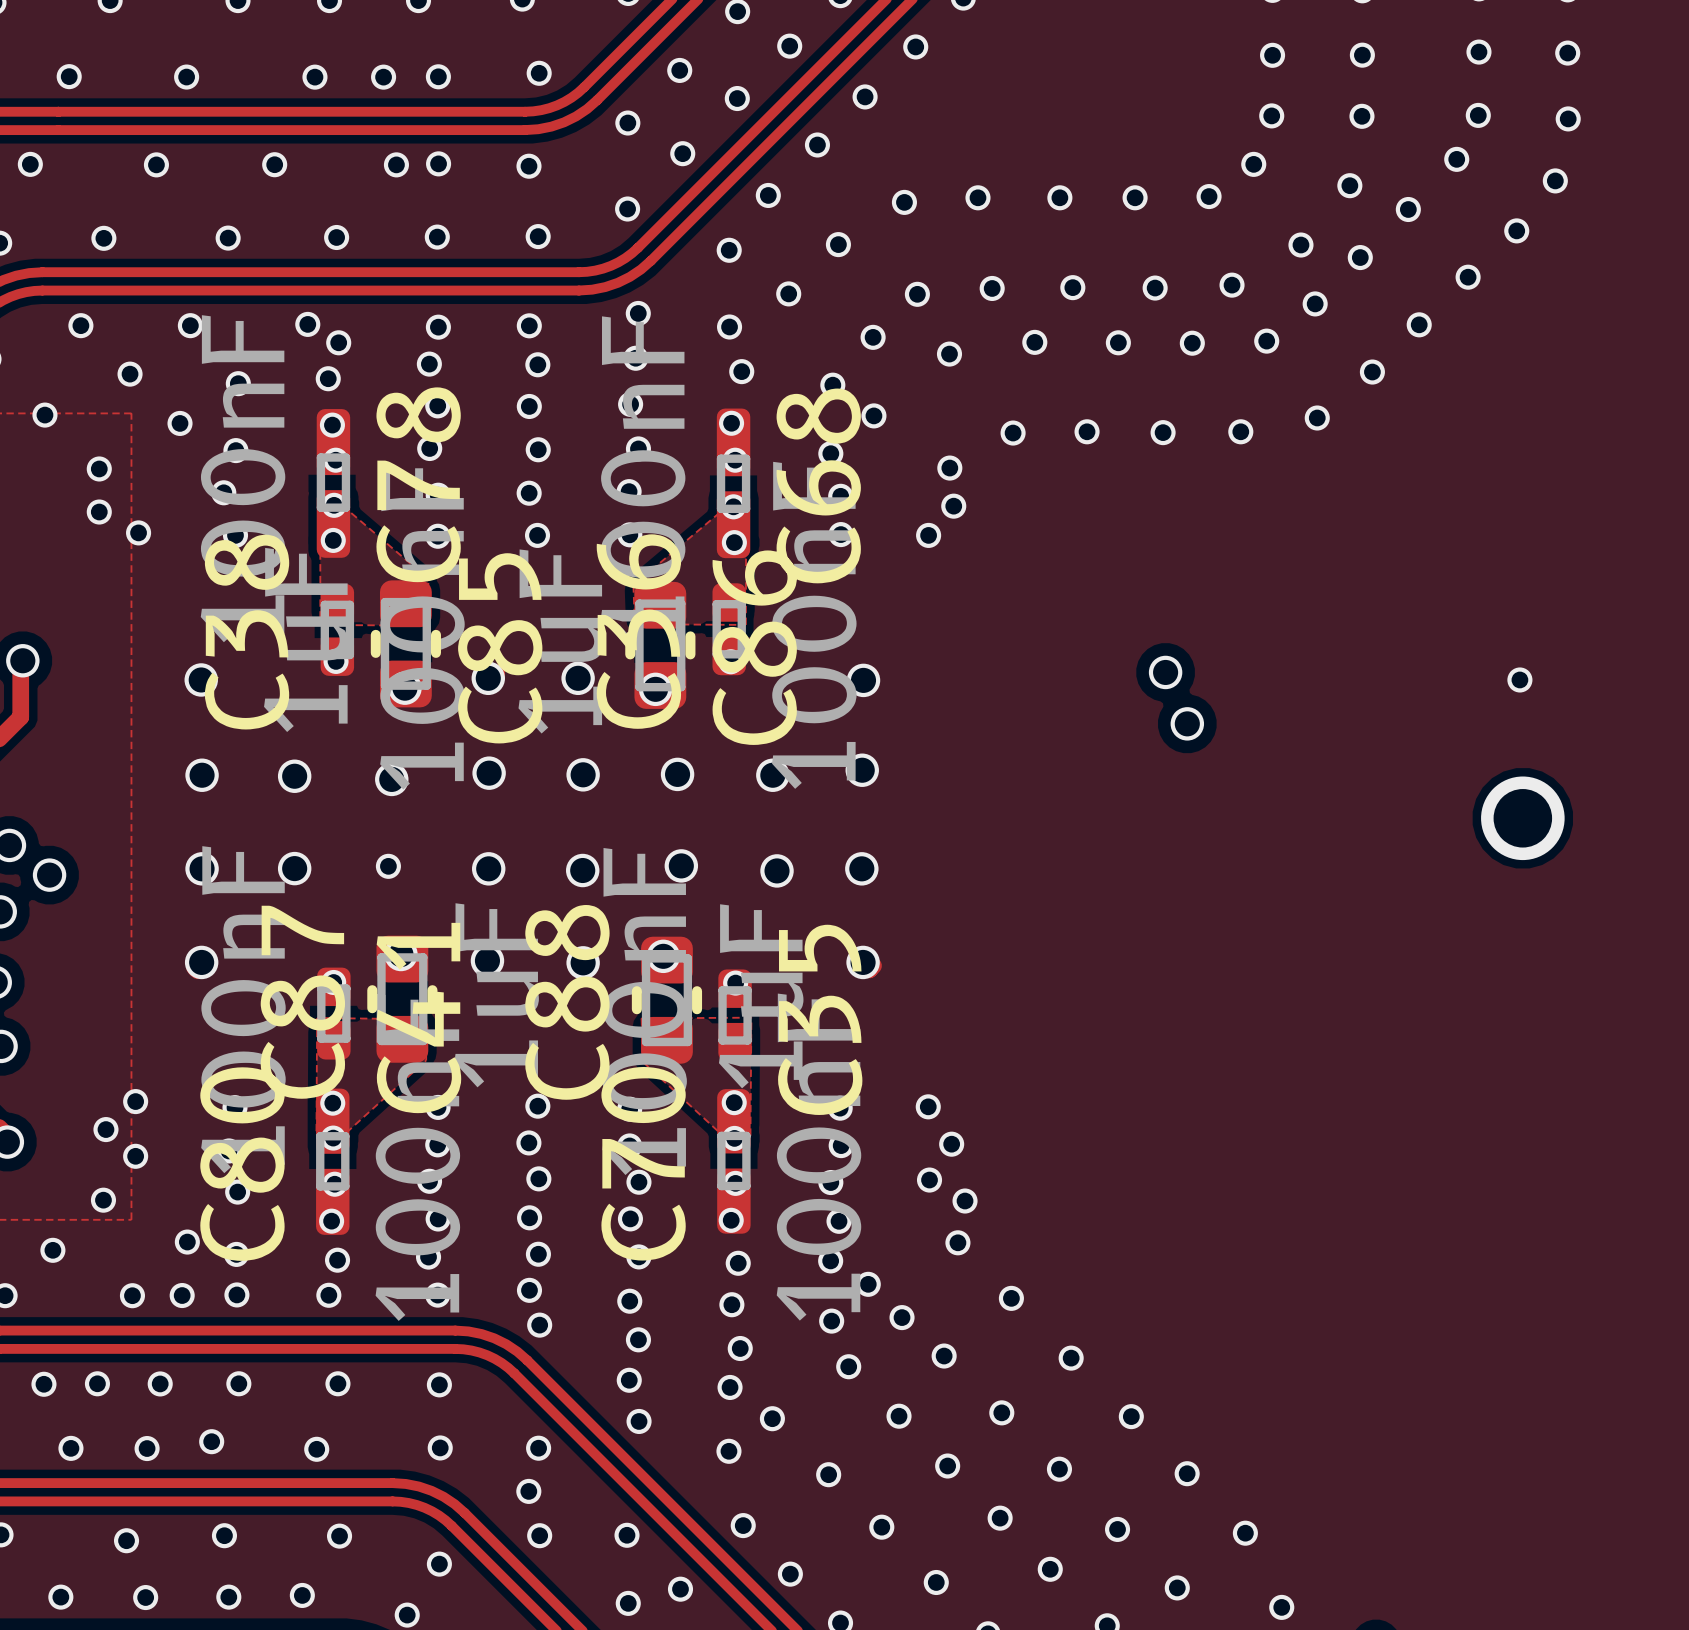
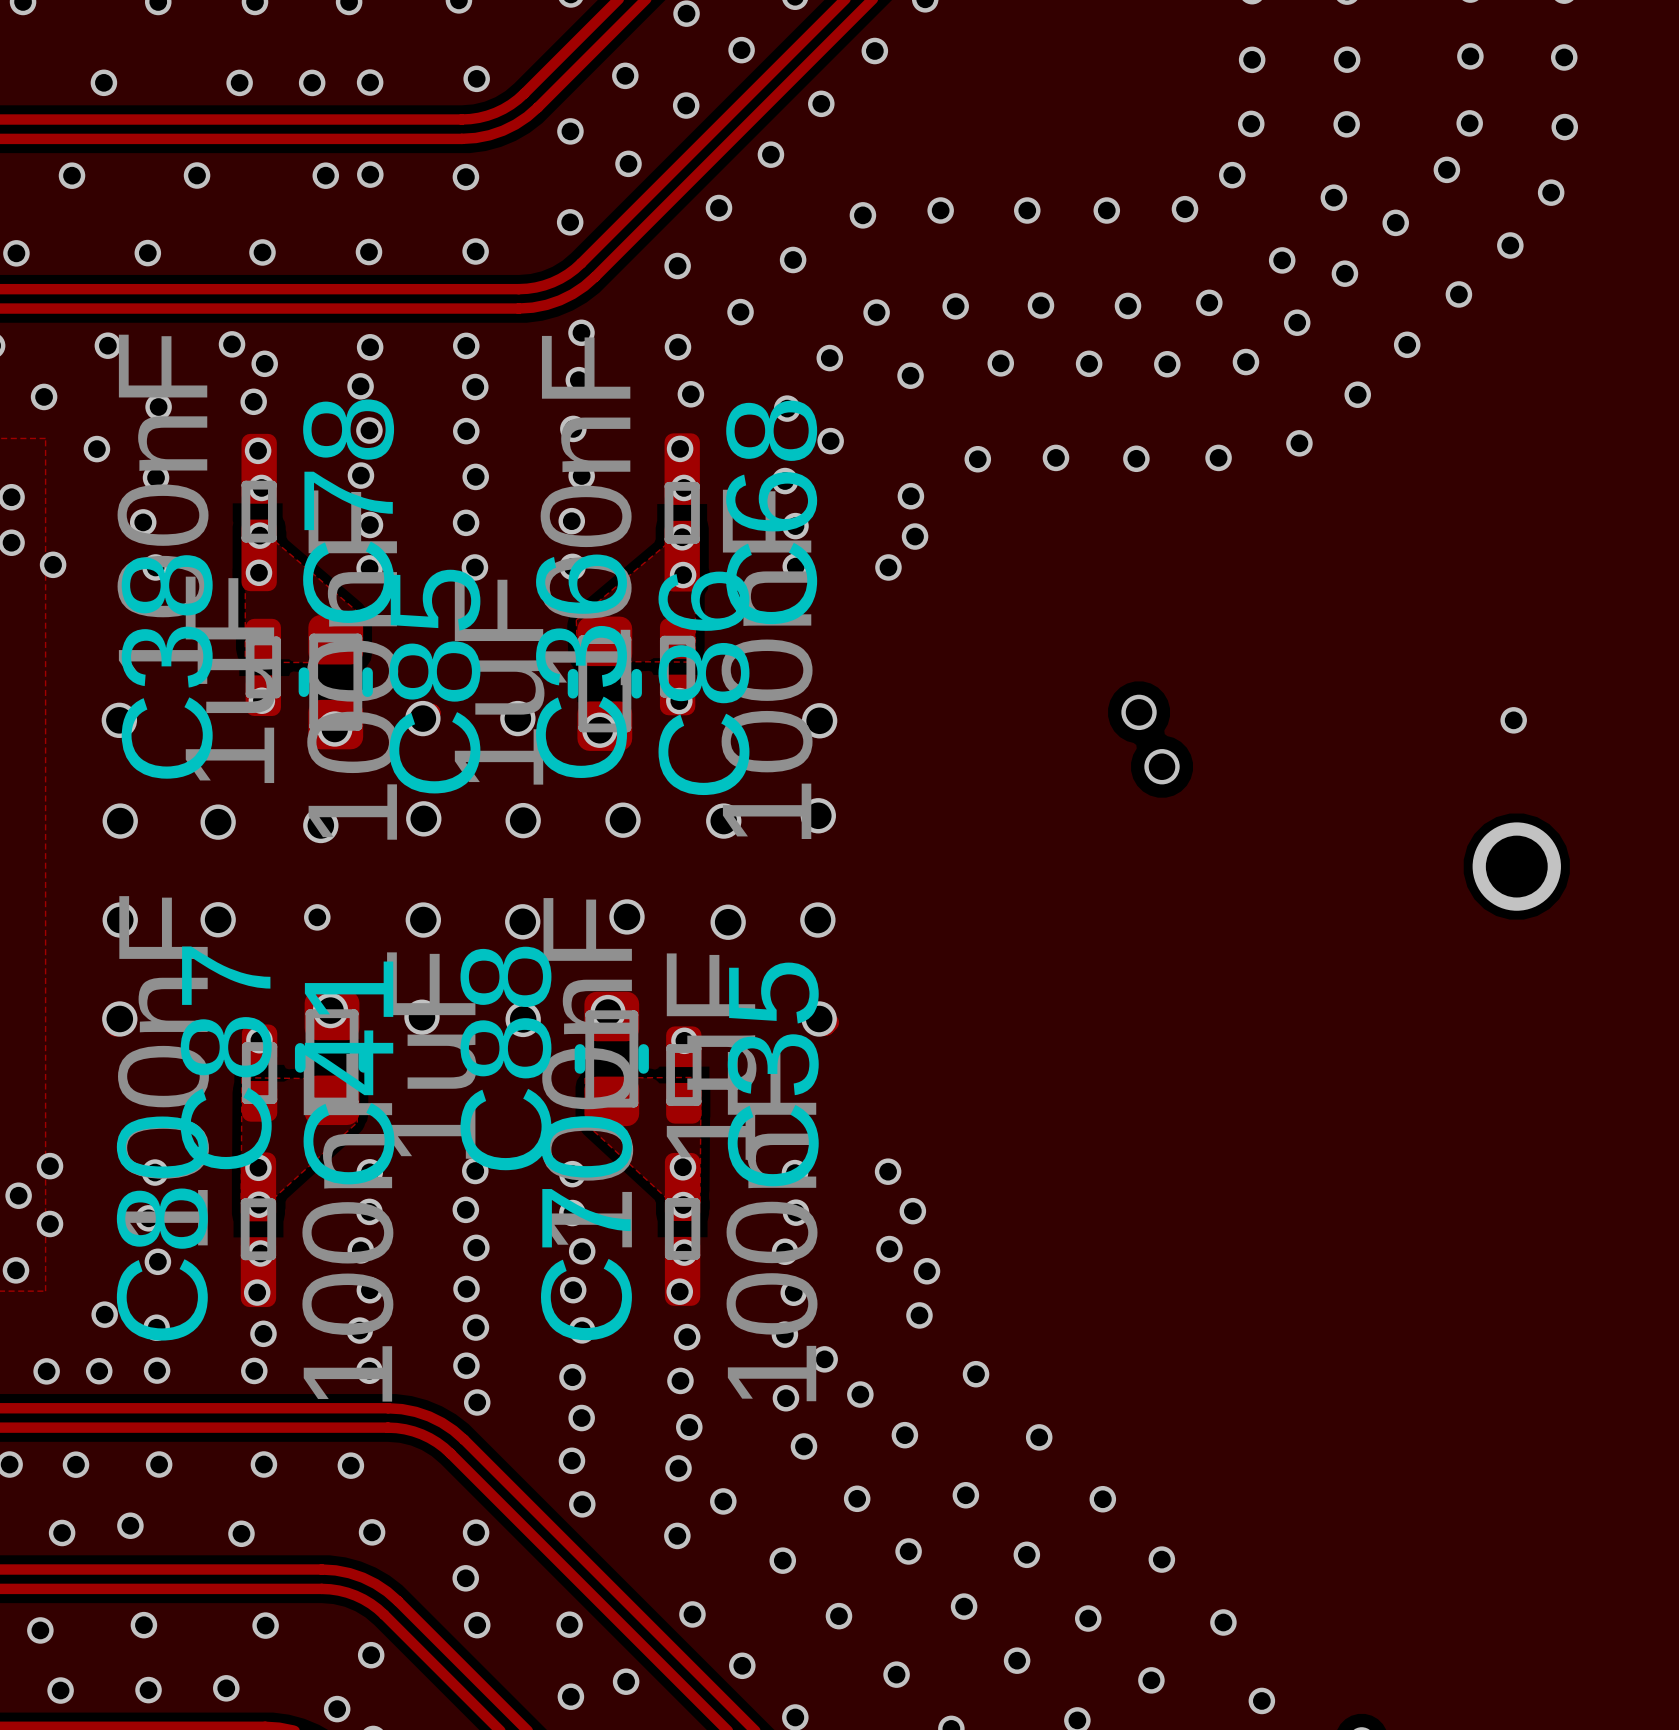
via position: (439, 1384) -> (350, 1465)

